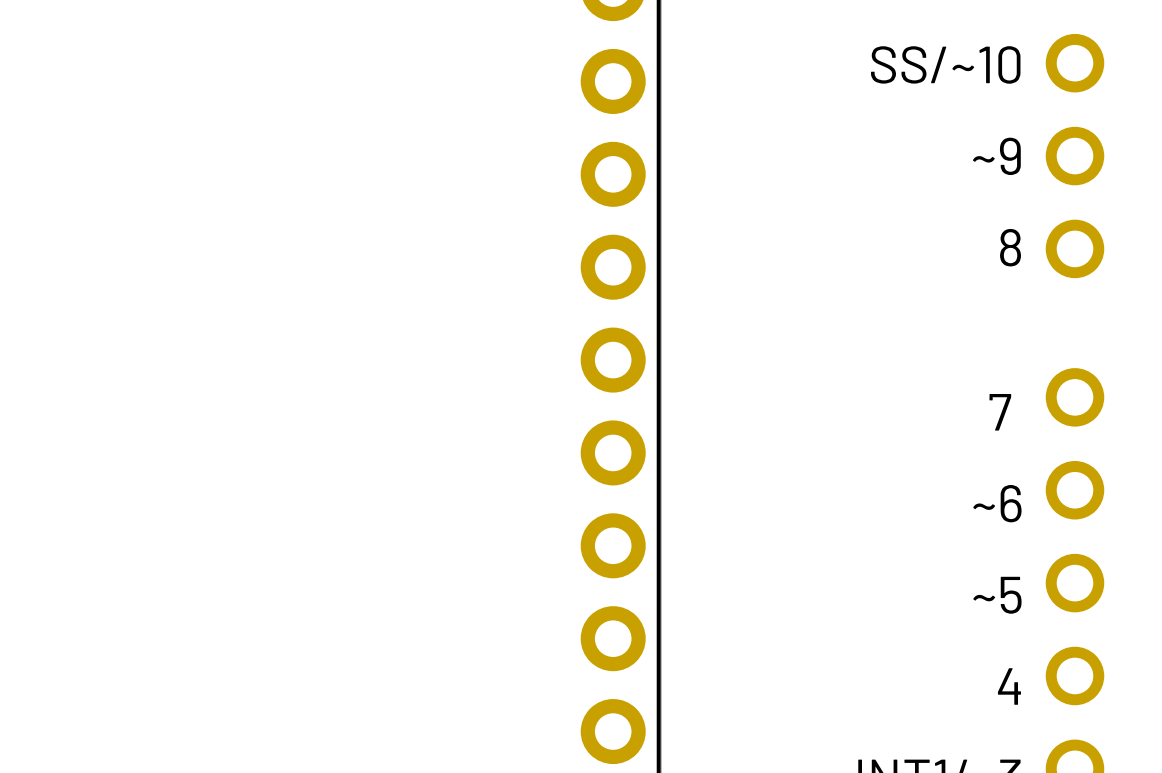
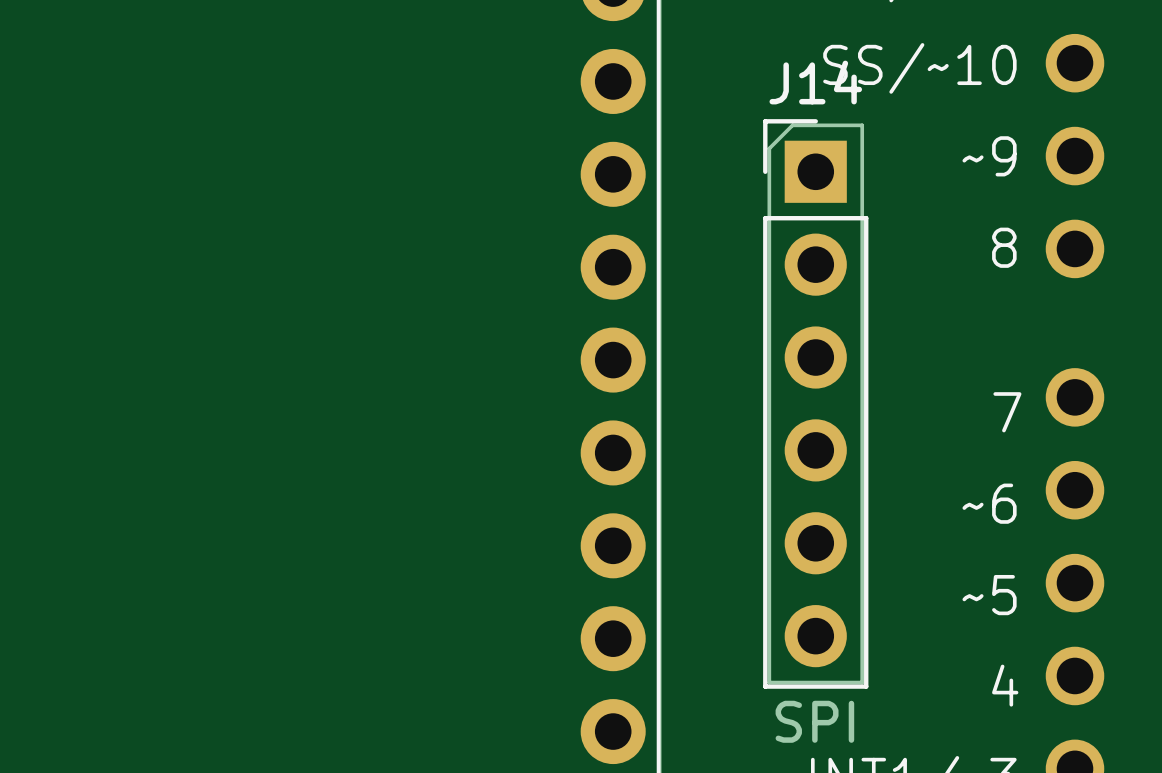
J14: none -> SPI (815, 403)

